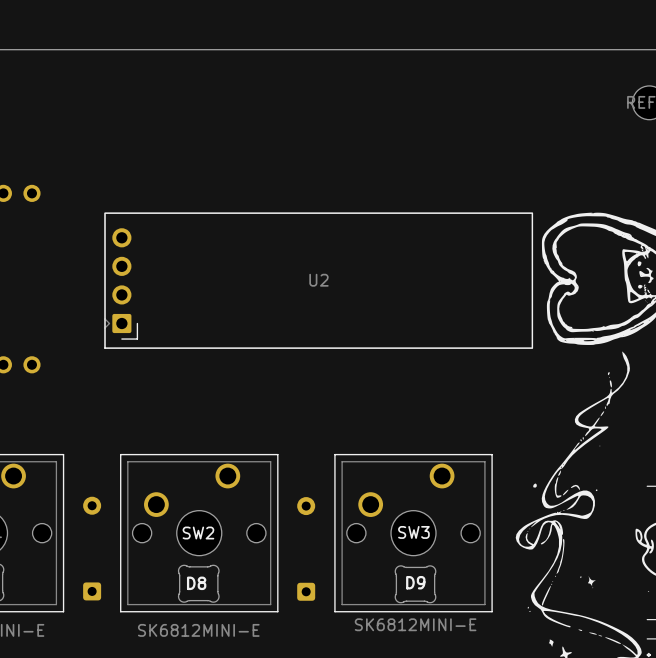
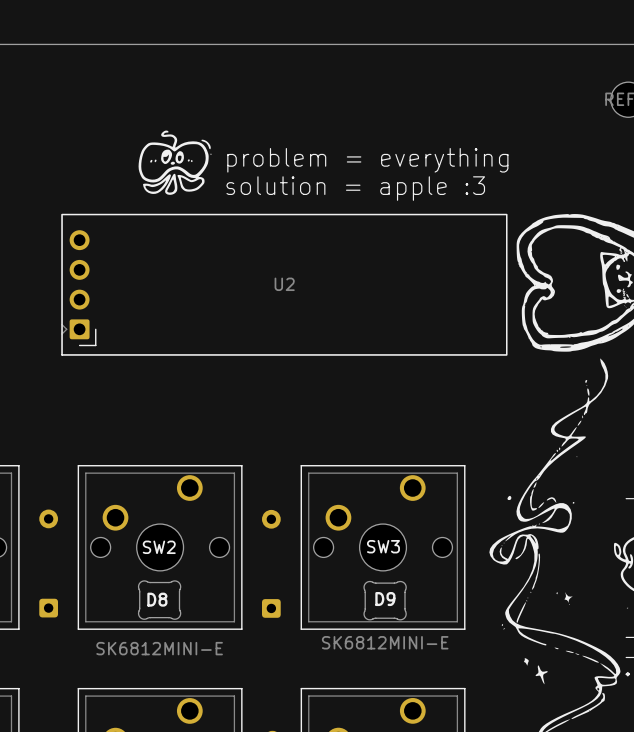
drawing: none -> [138, 130, 212, 195]
text: none -> problem = everything (367, 160)
text: none -> solution = apple :3 (355, 188)

